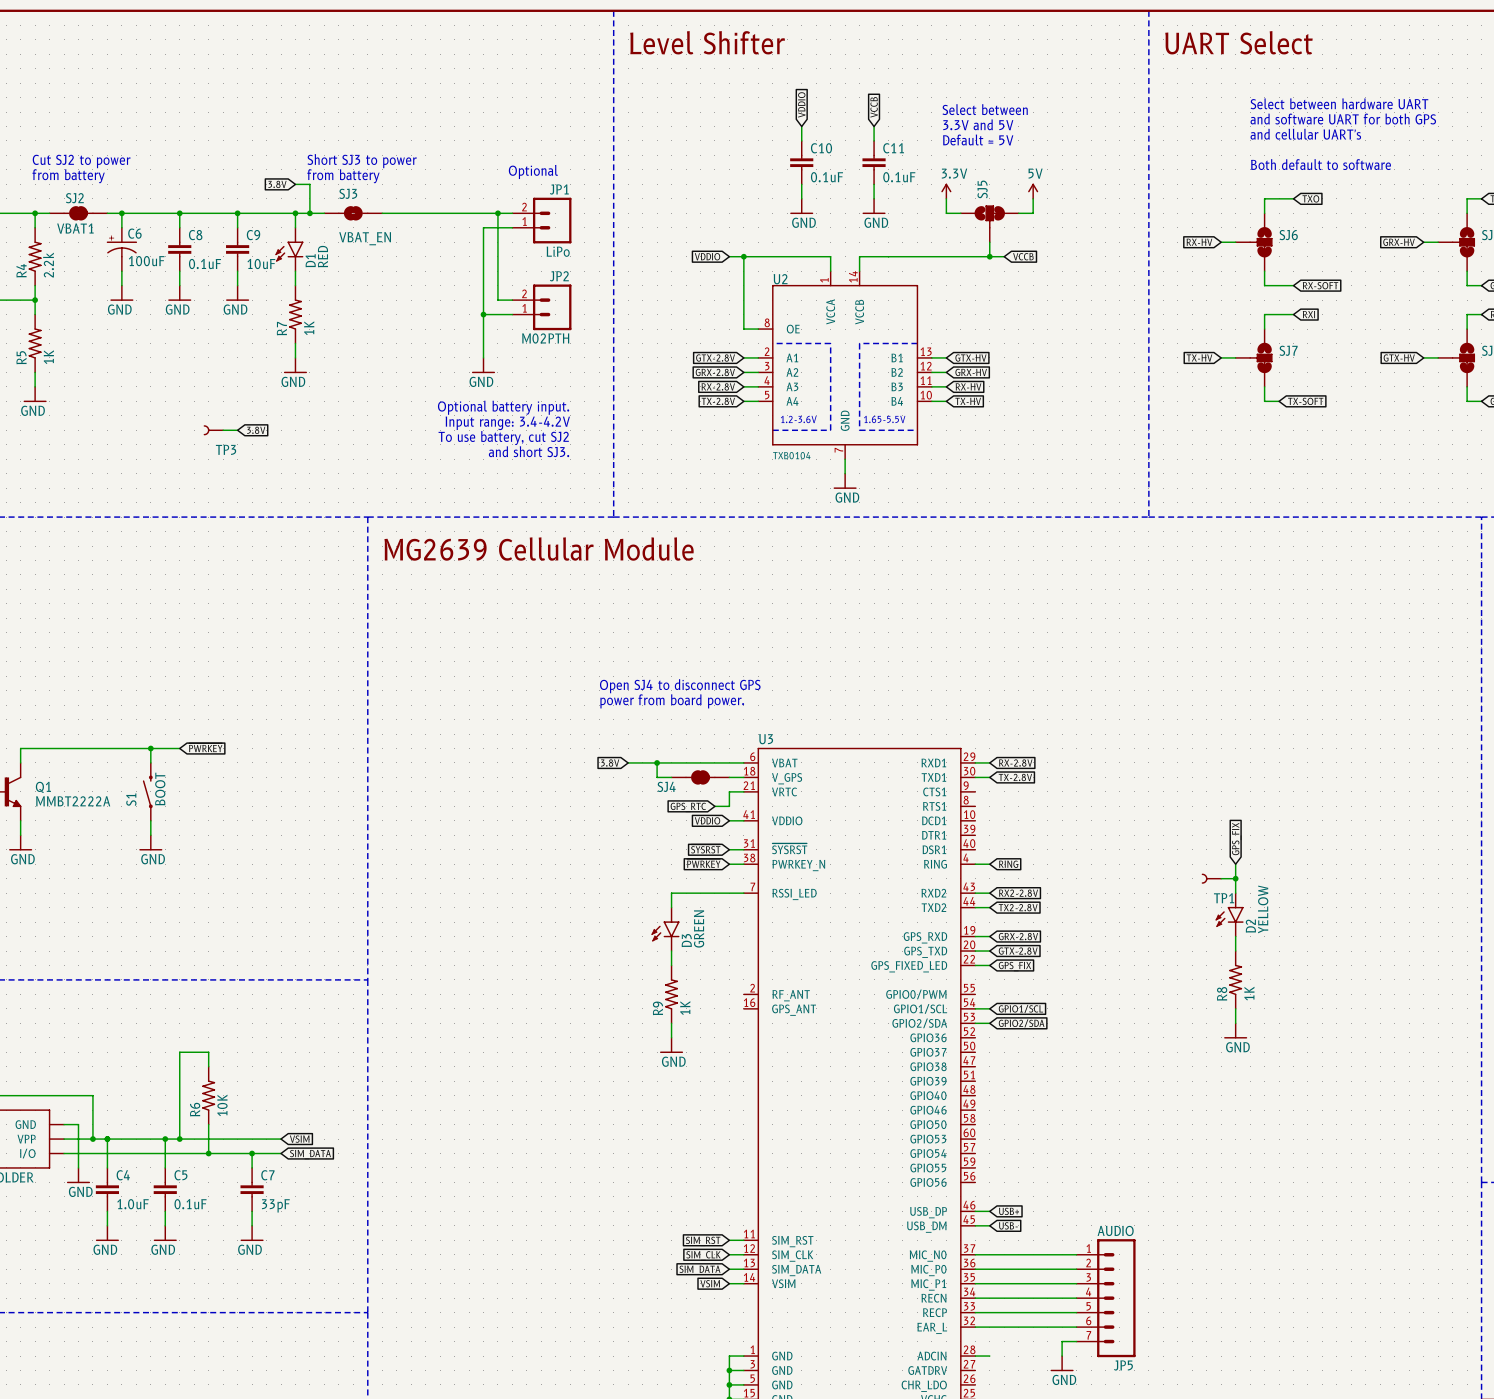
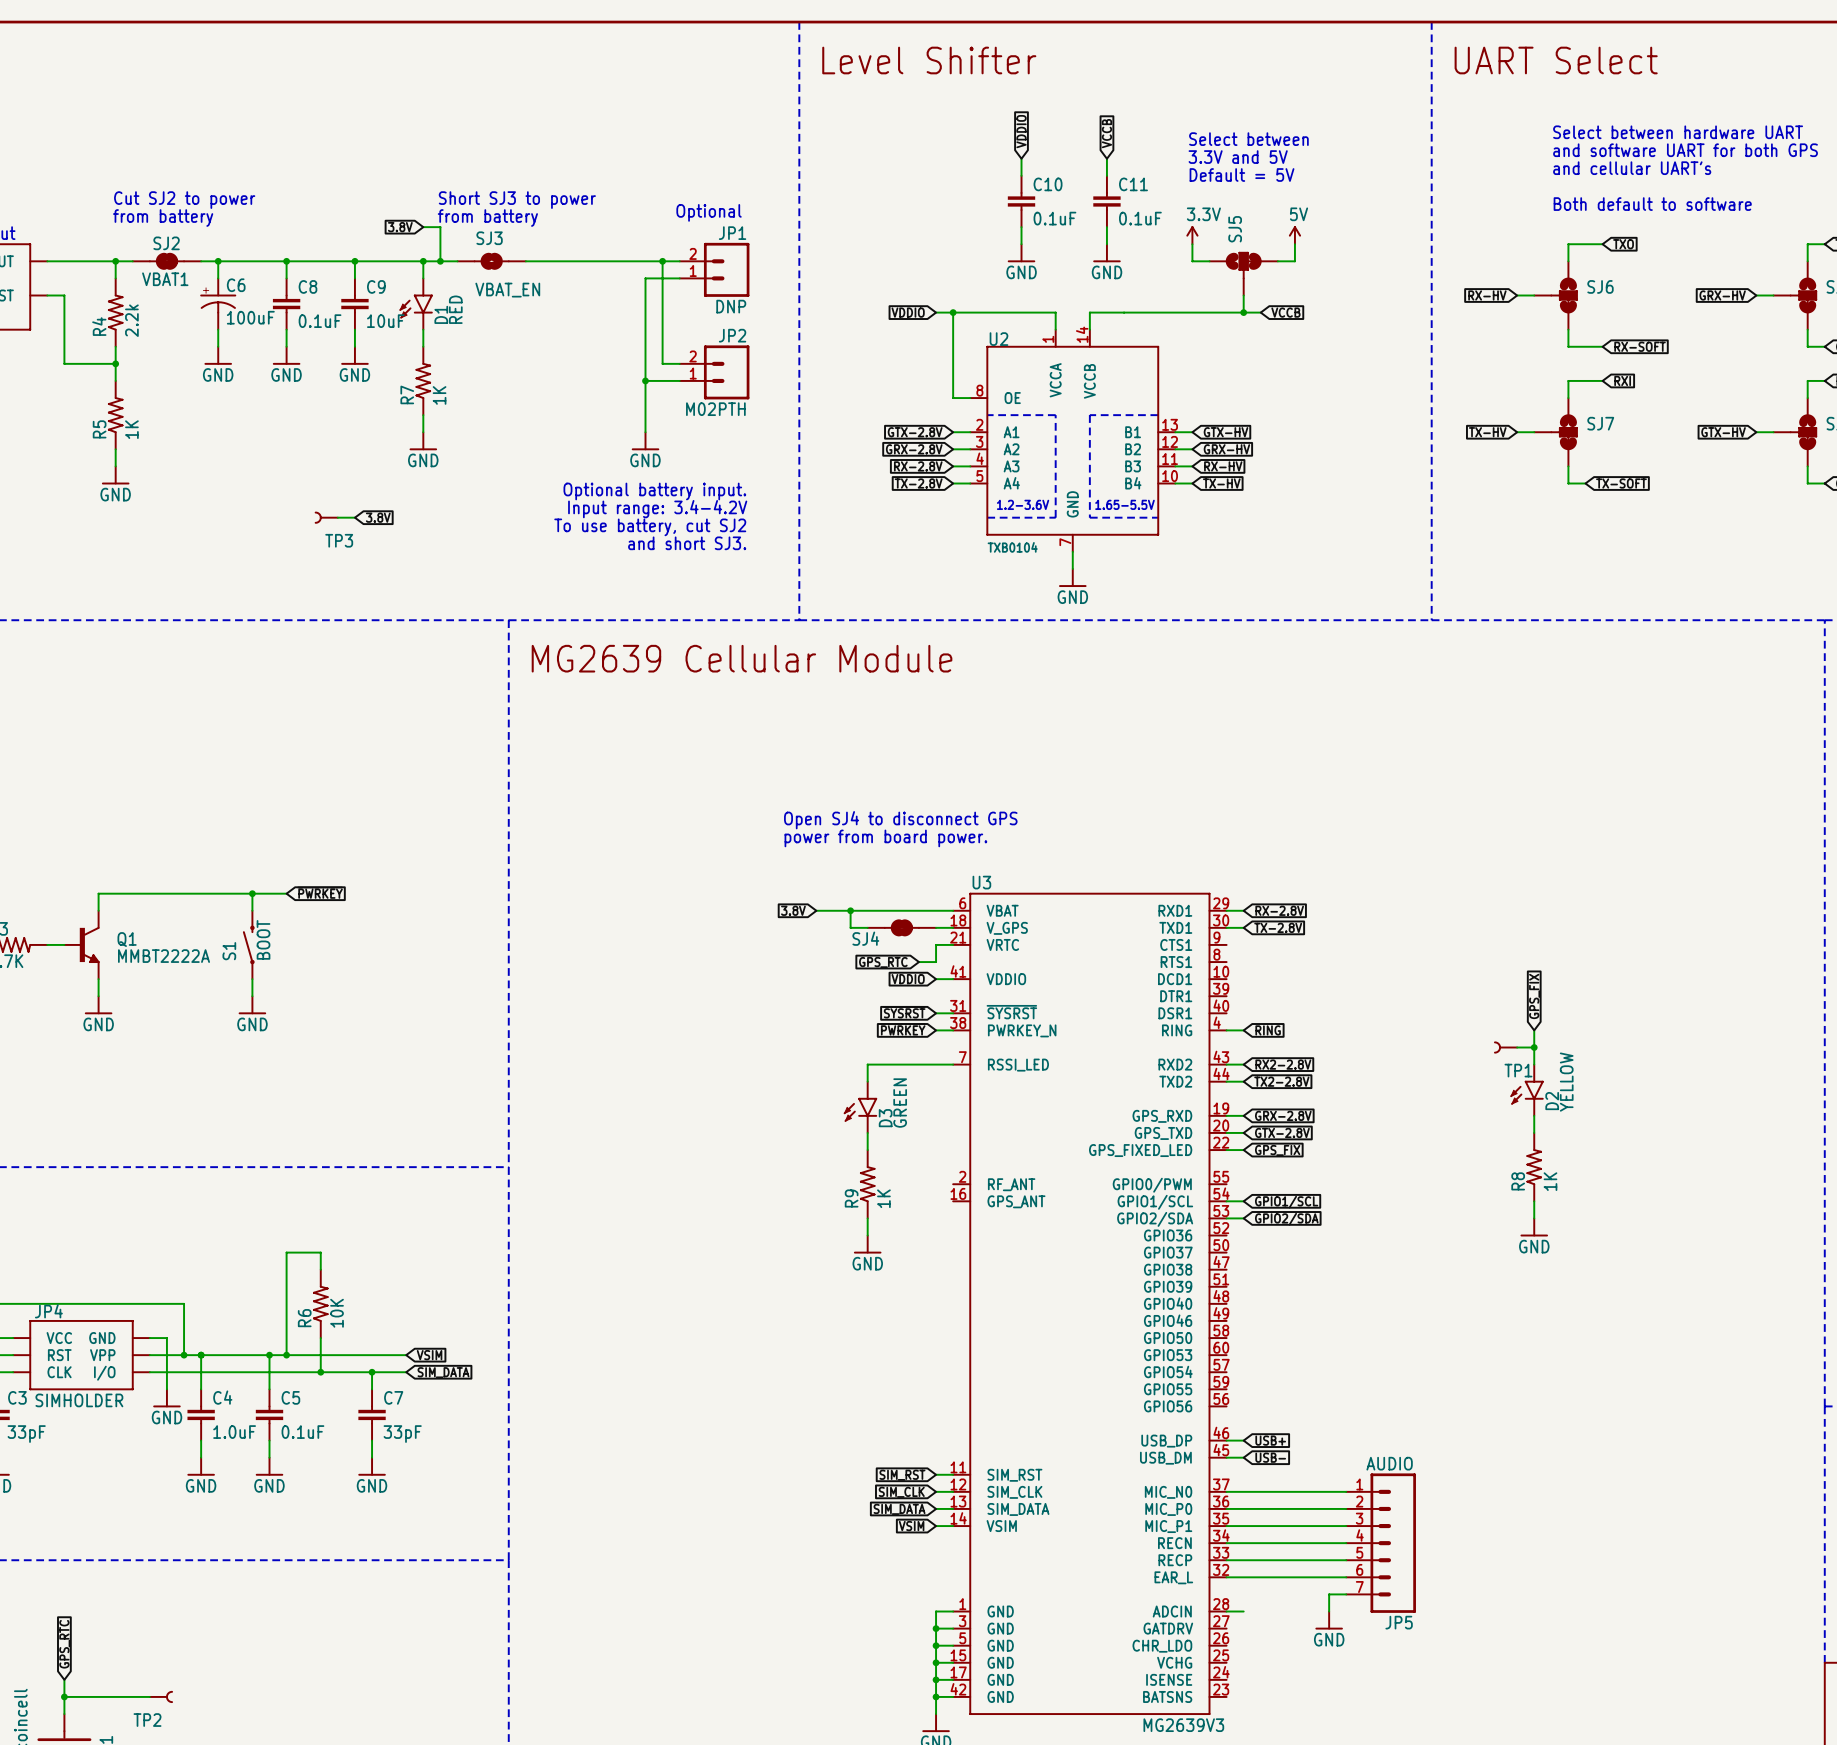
JP1 value: LiPo (558, 251) -> DNP (731, 306)

